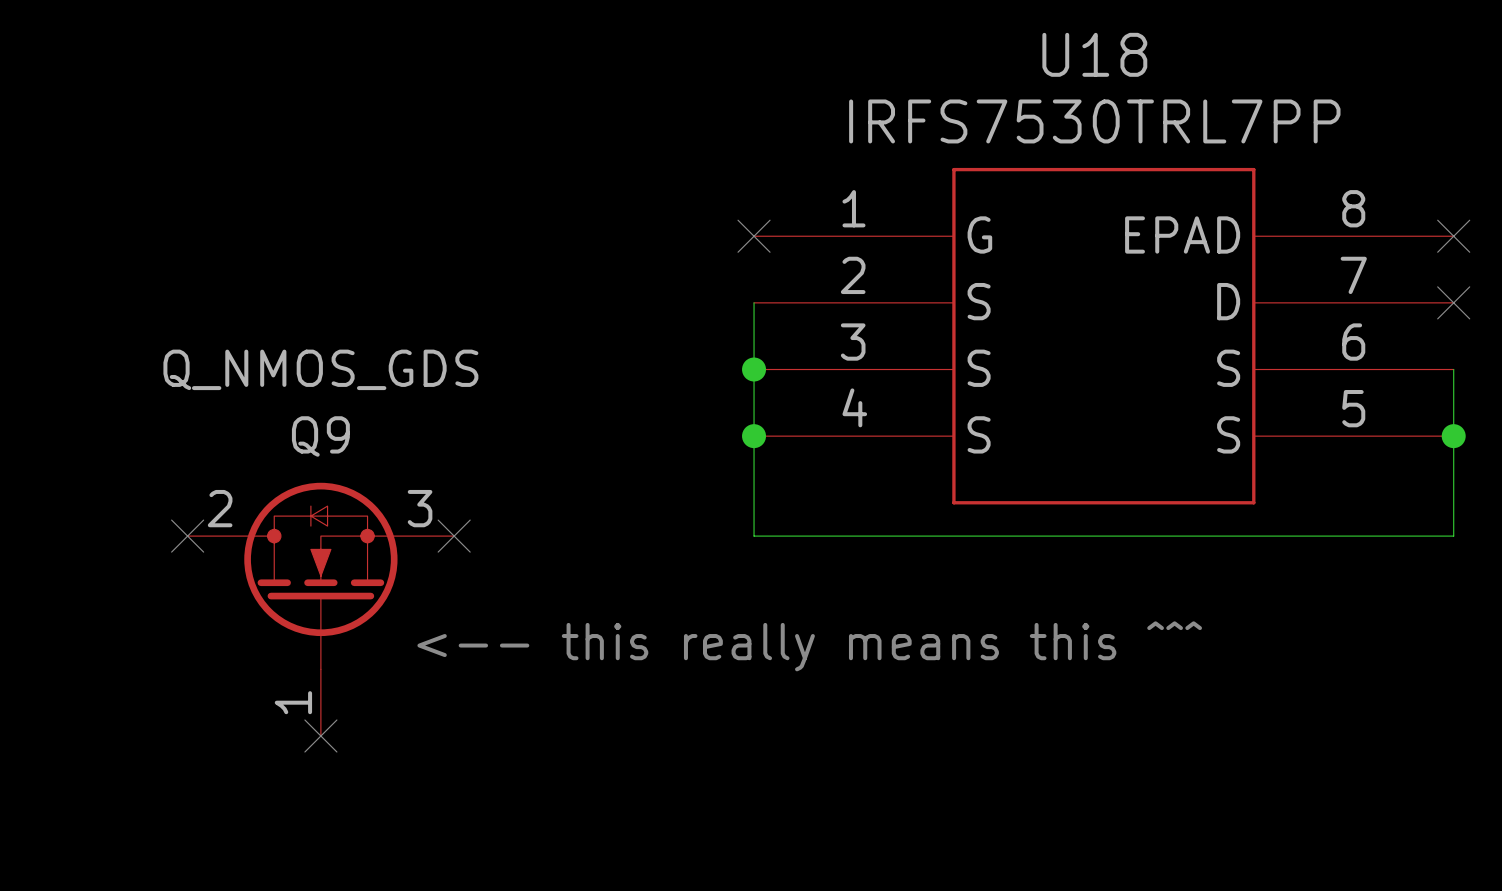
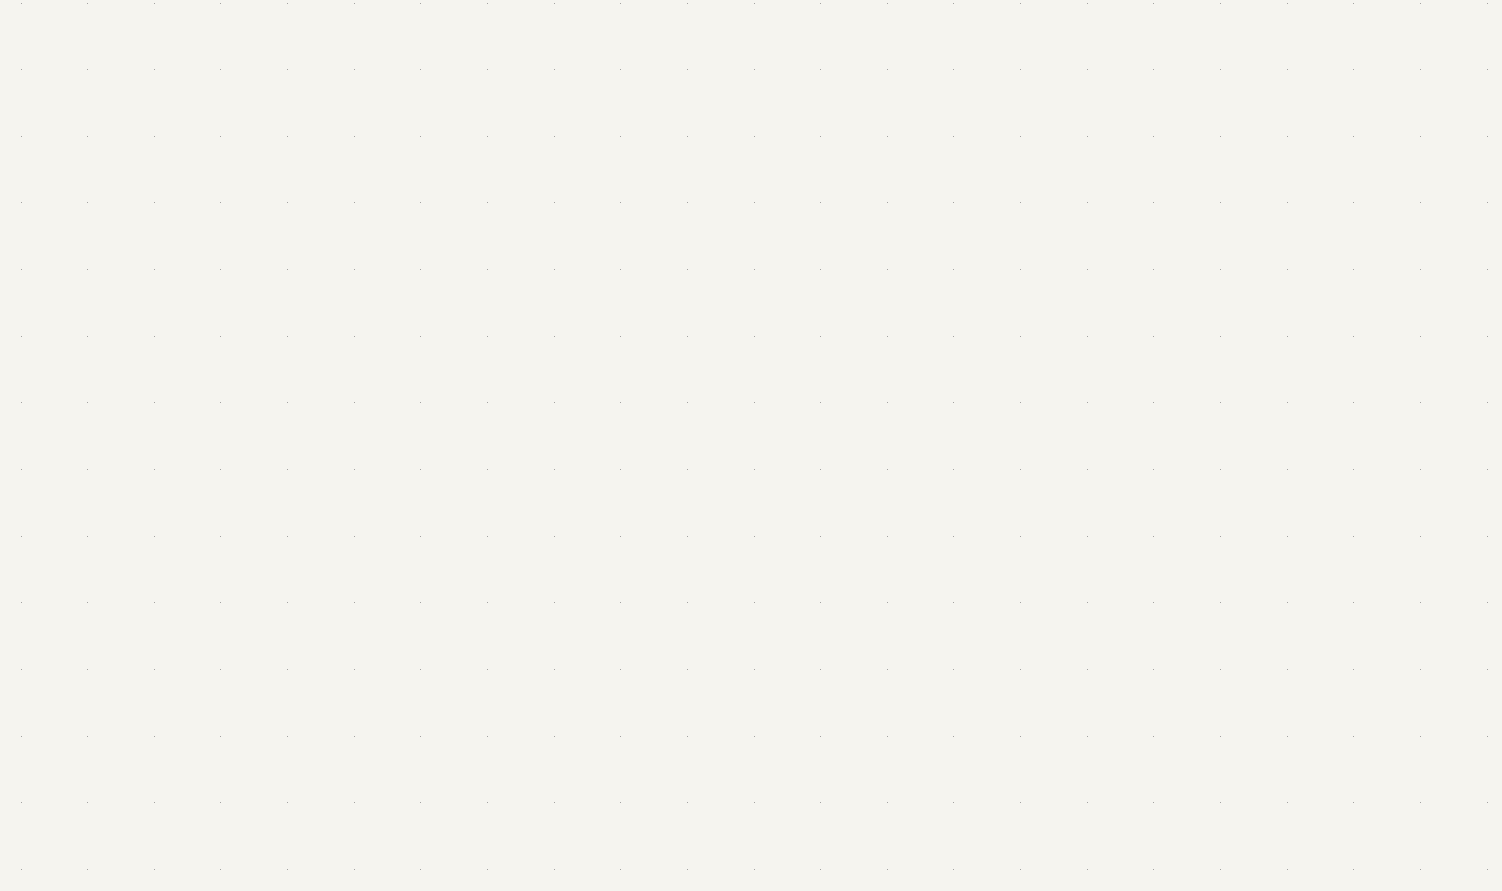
no-connect mark: (754, 236) -> none
no-connect mark: (1453, 236) -> none
wire: (754, 302) (754, 536) (1453, 536) (1453, 369) -> none
no-connect mark: (1453, 302) -> none
U18: IRFS7530TRL7PP (1103, 336) -> none
junction: (754, 369) -> none
junction: (754, 436) -> none
junction: (1453, 436) -> none
no-connect mark: (187, 536) -> none
no-connect mark: (454, 536) -> none
Q9: Q_NMOS_GDS (320, 609) -> none
text: <-- this really means this ^^^ (809, 646) -> none
no-connect mark: (320, 736) -> none

